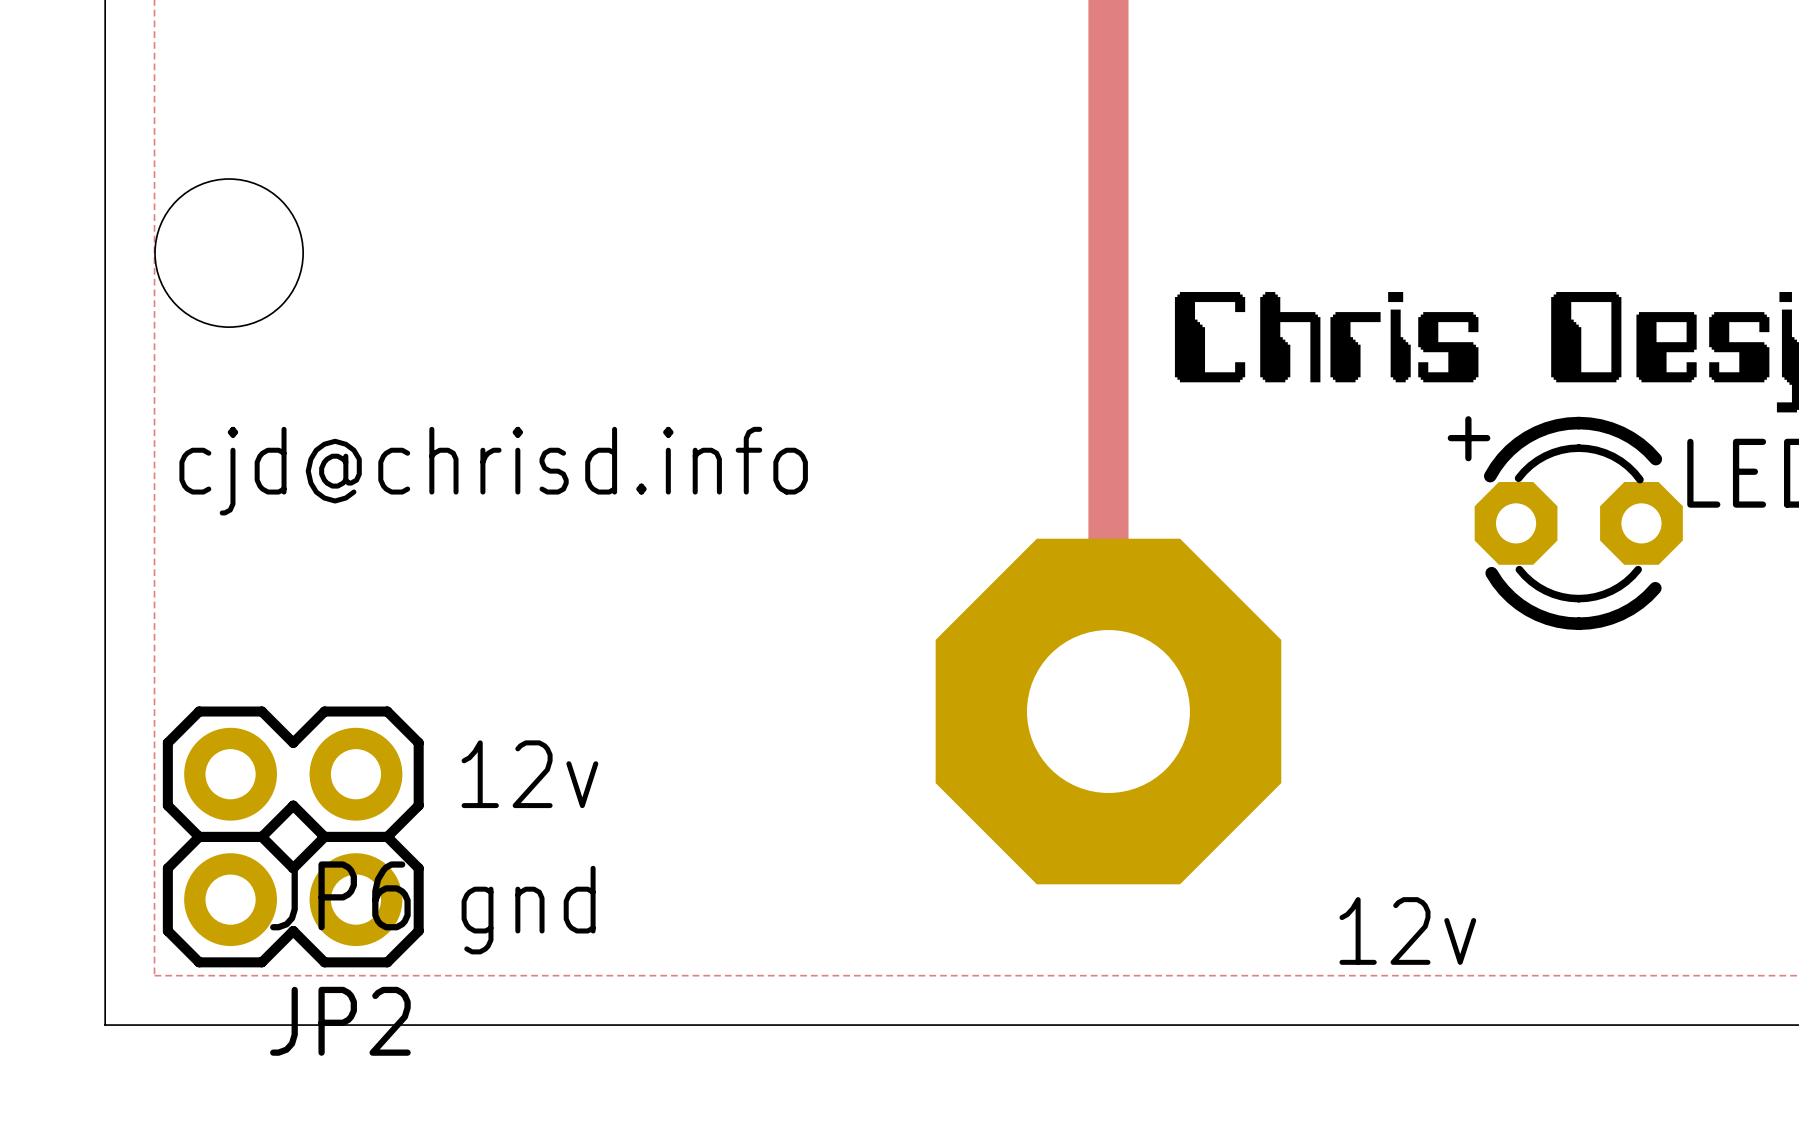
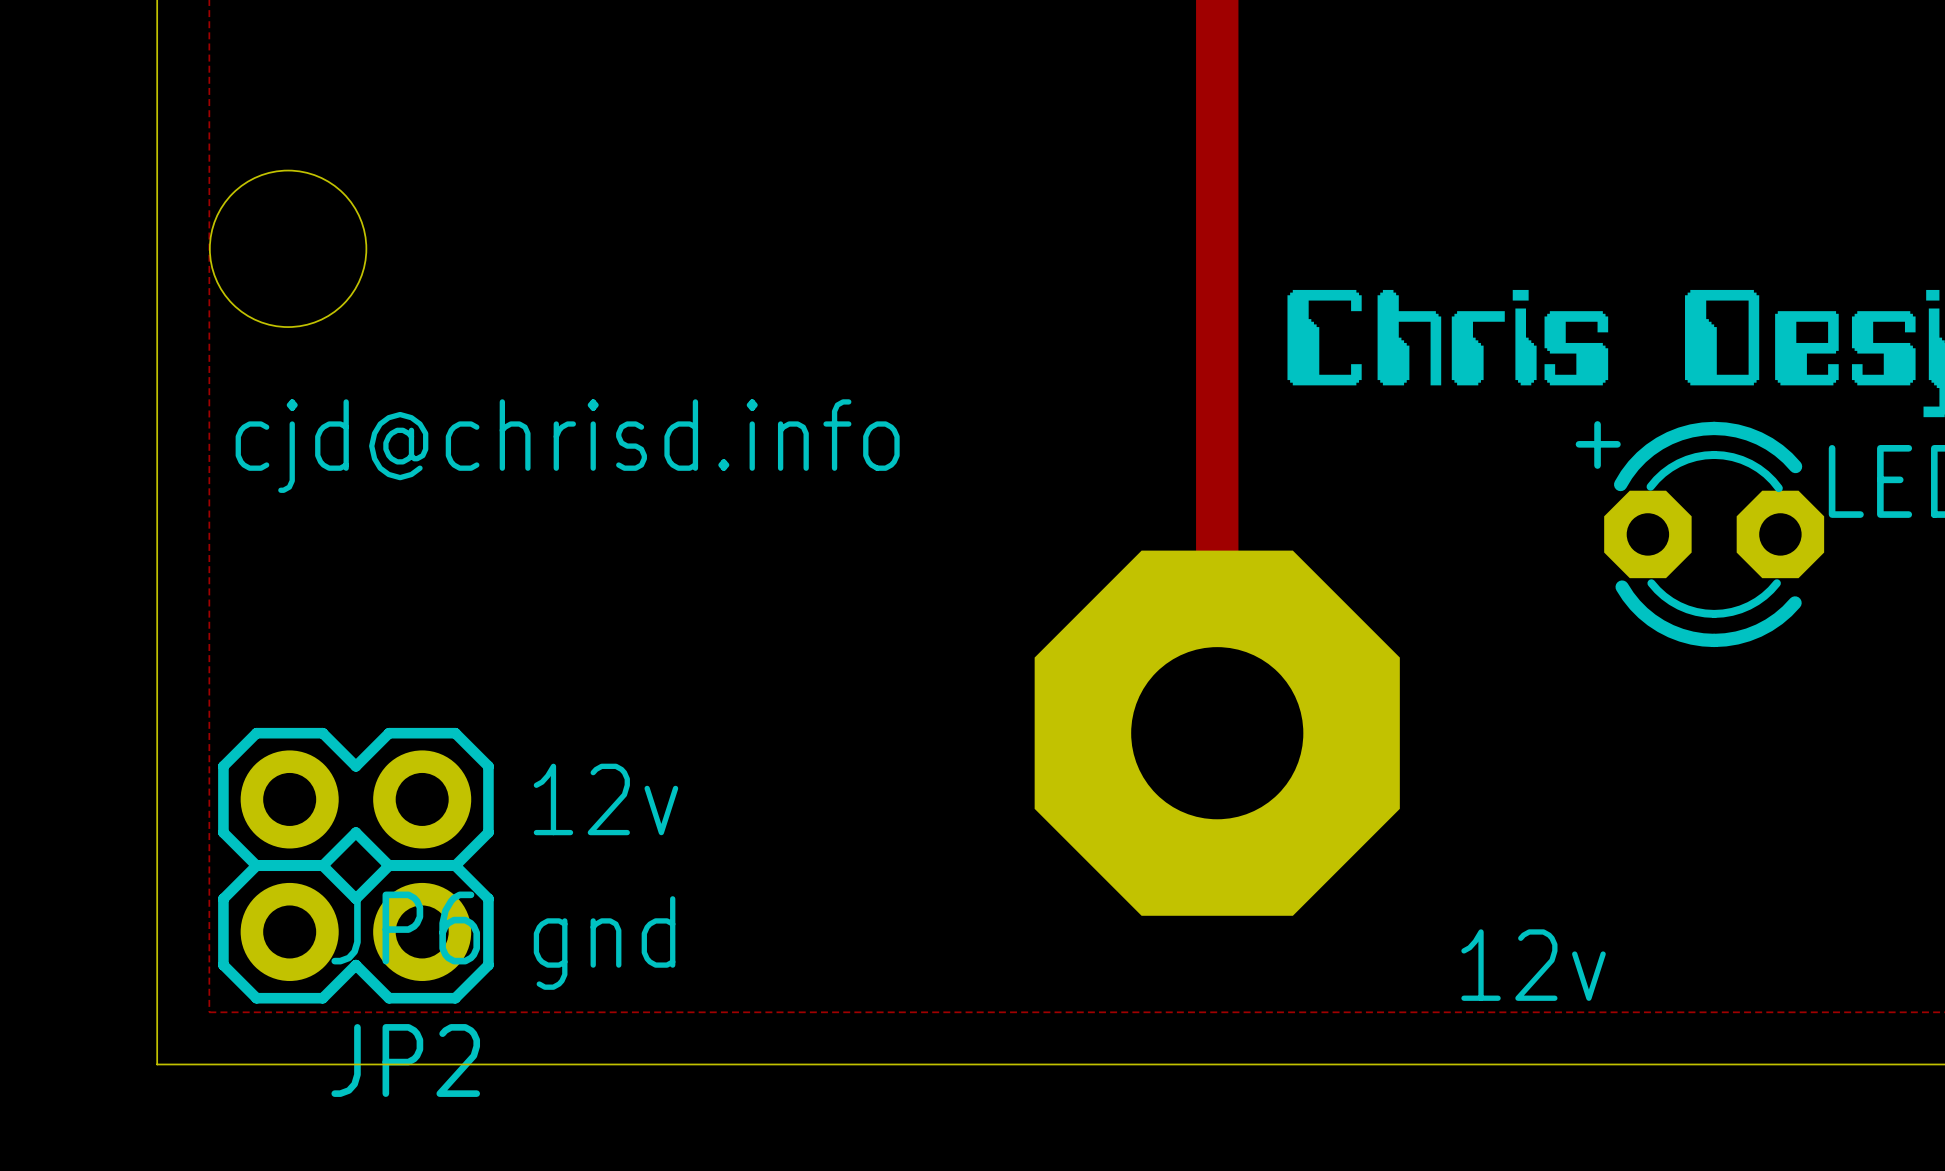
text position: cjd@chrisd.info (493, 471) -> cjd@chrisd.info (567, 446)

